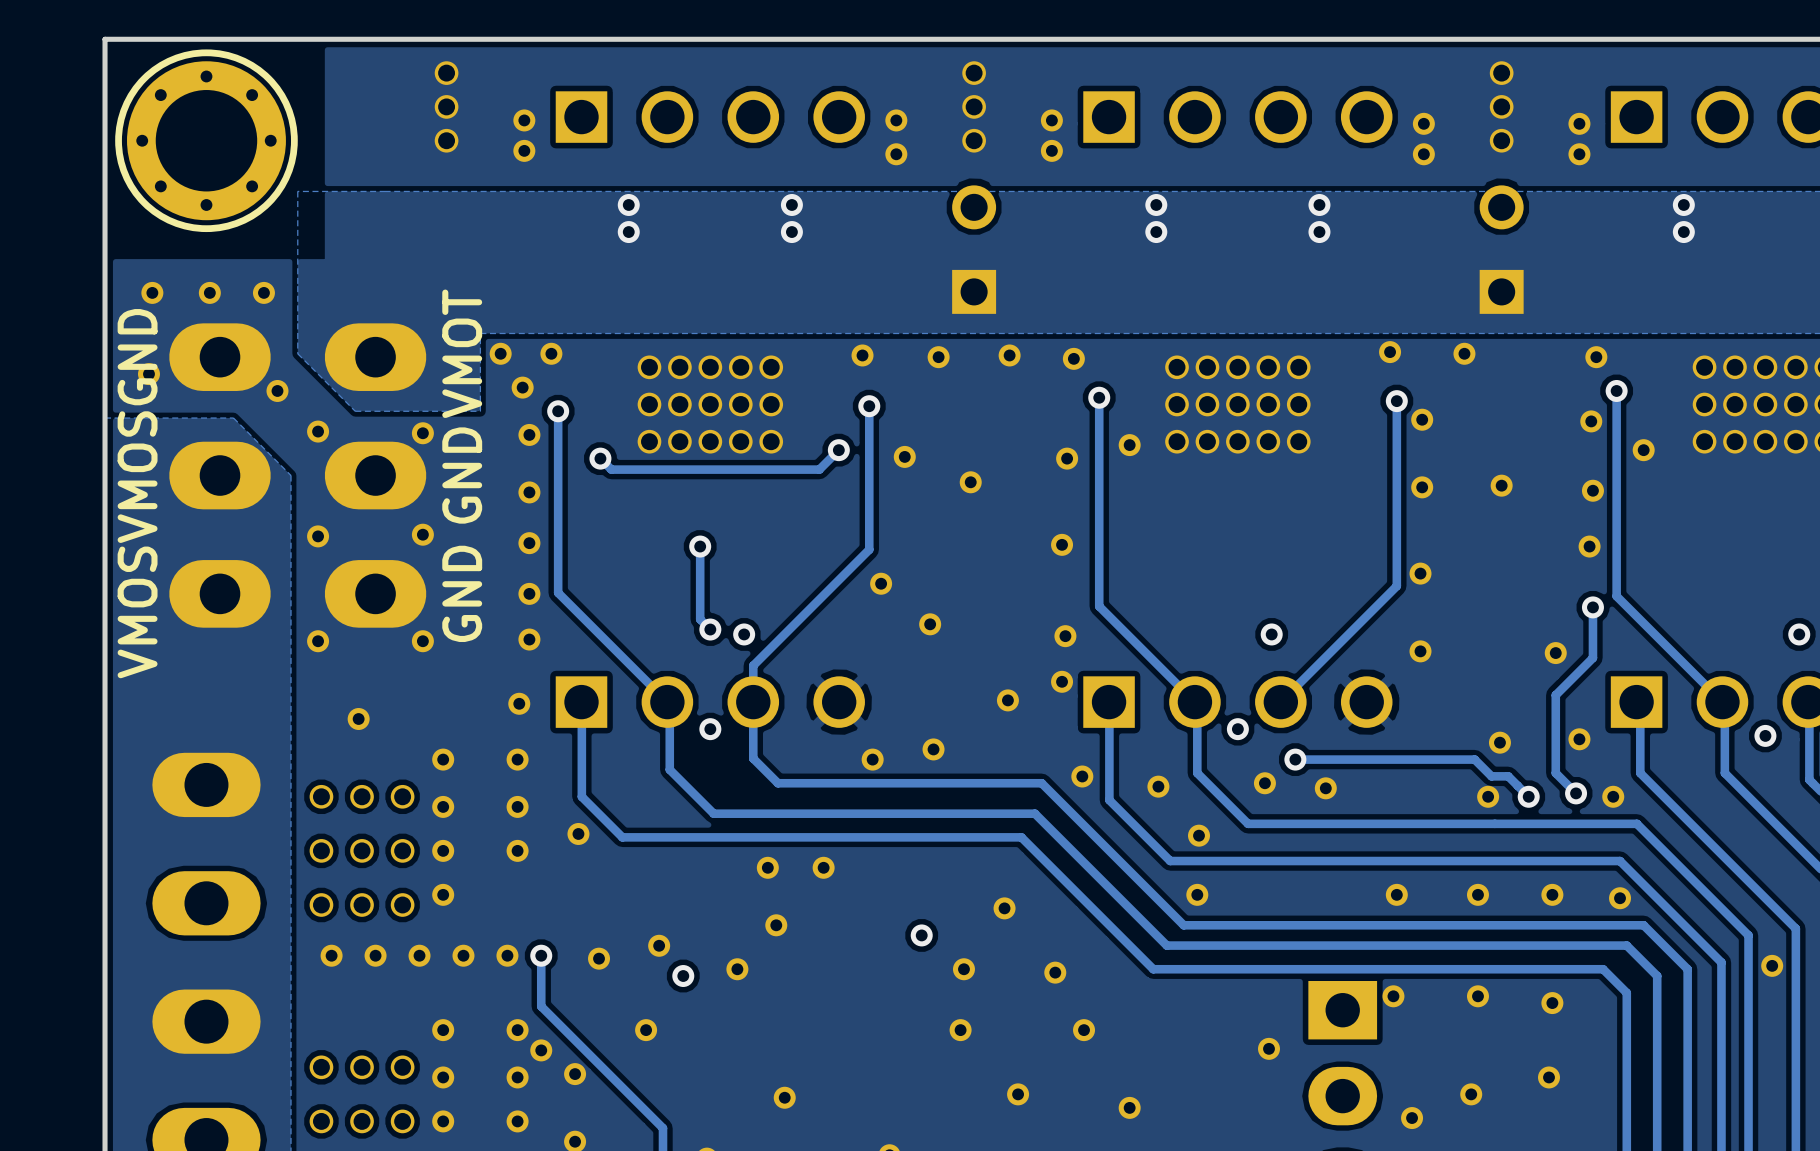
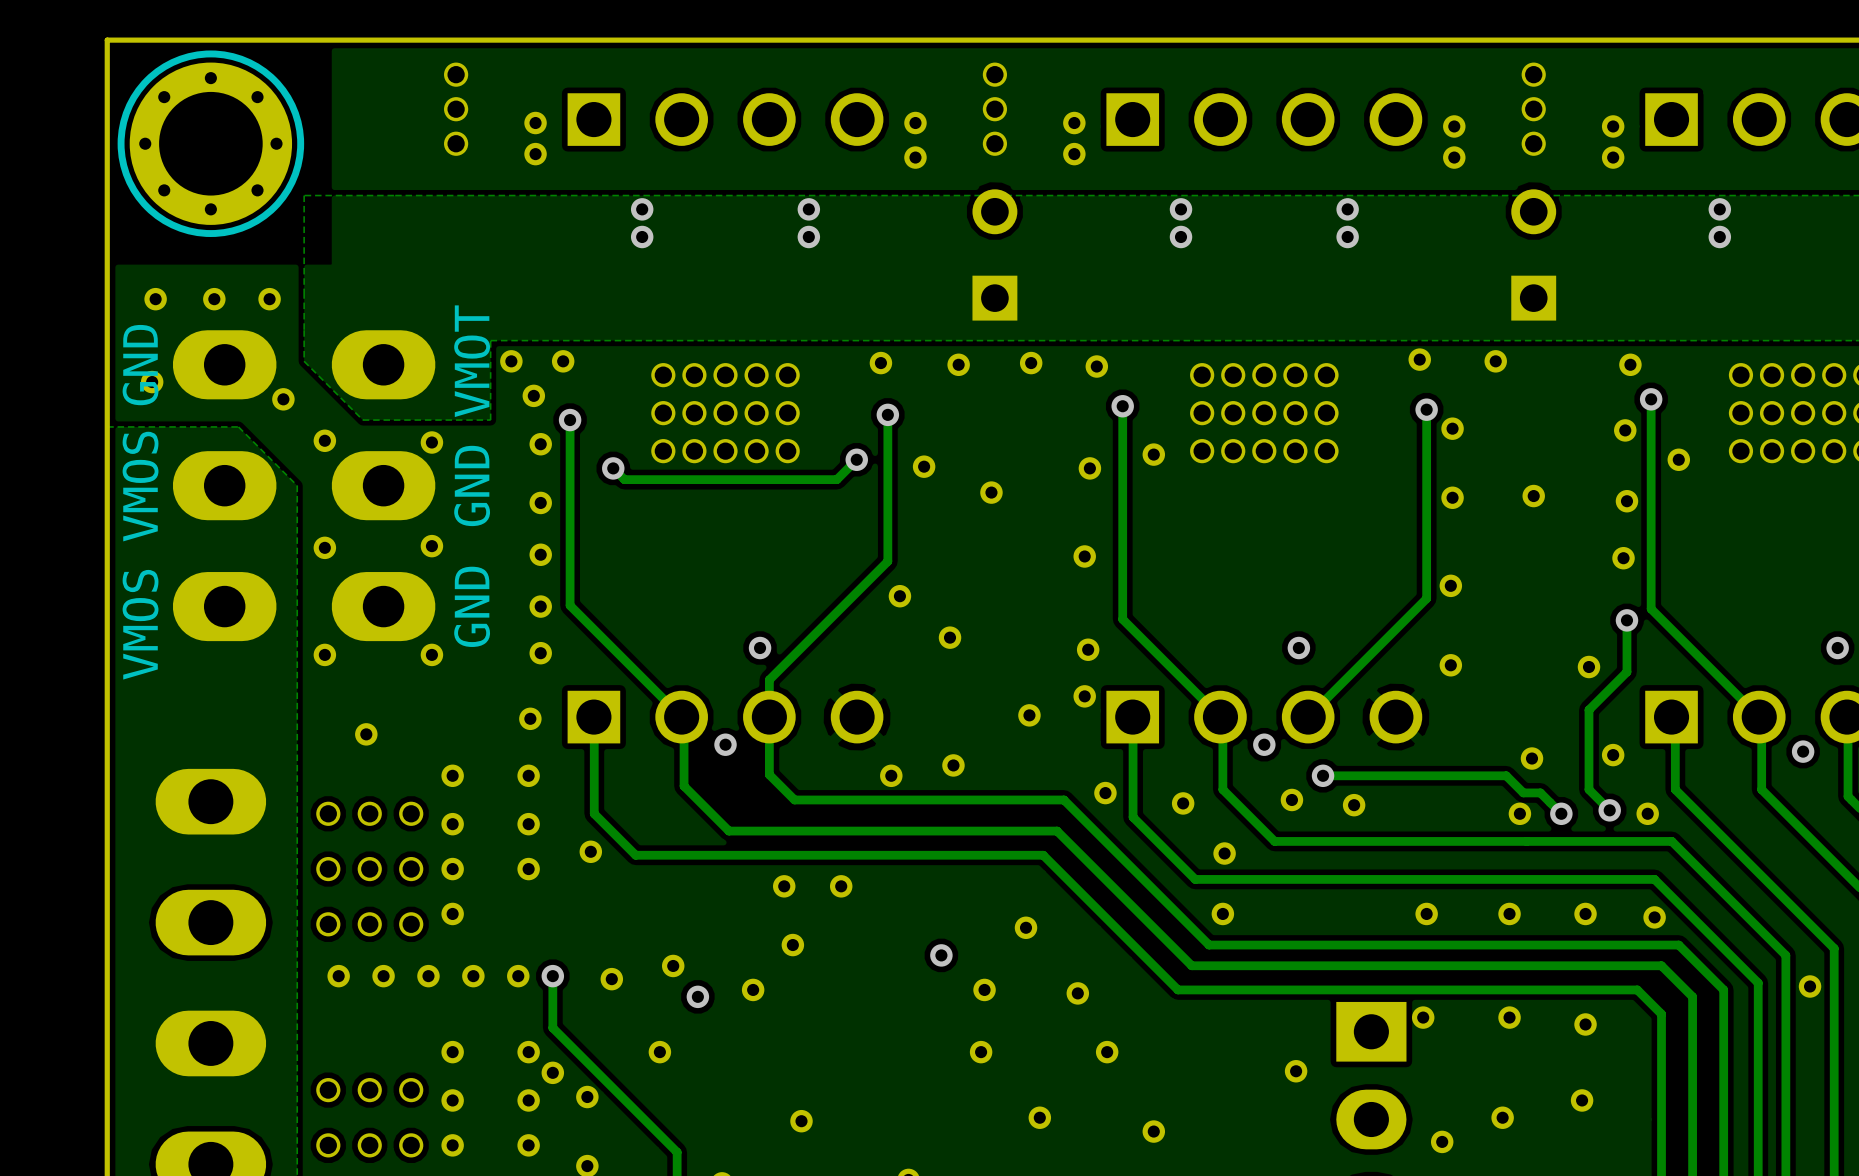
track: (700, 546) (700, 619) (710, 629) -> none
via: (700, 546) -> none
via: (710, 629) -> none

